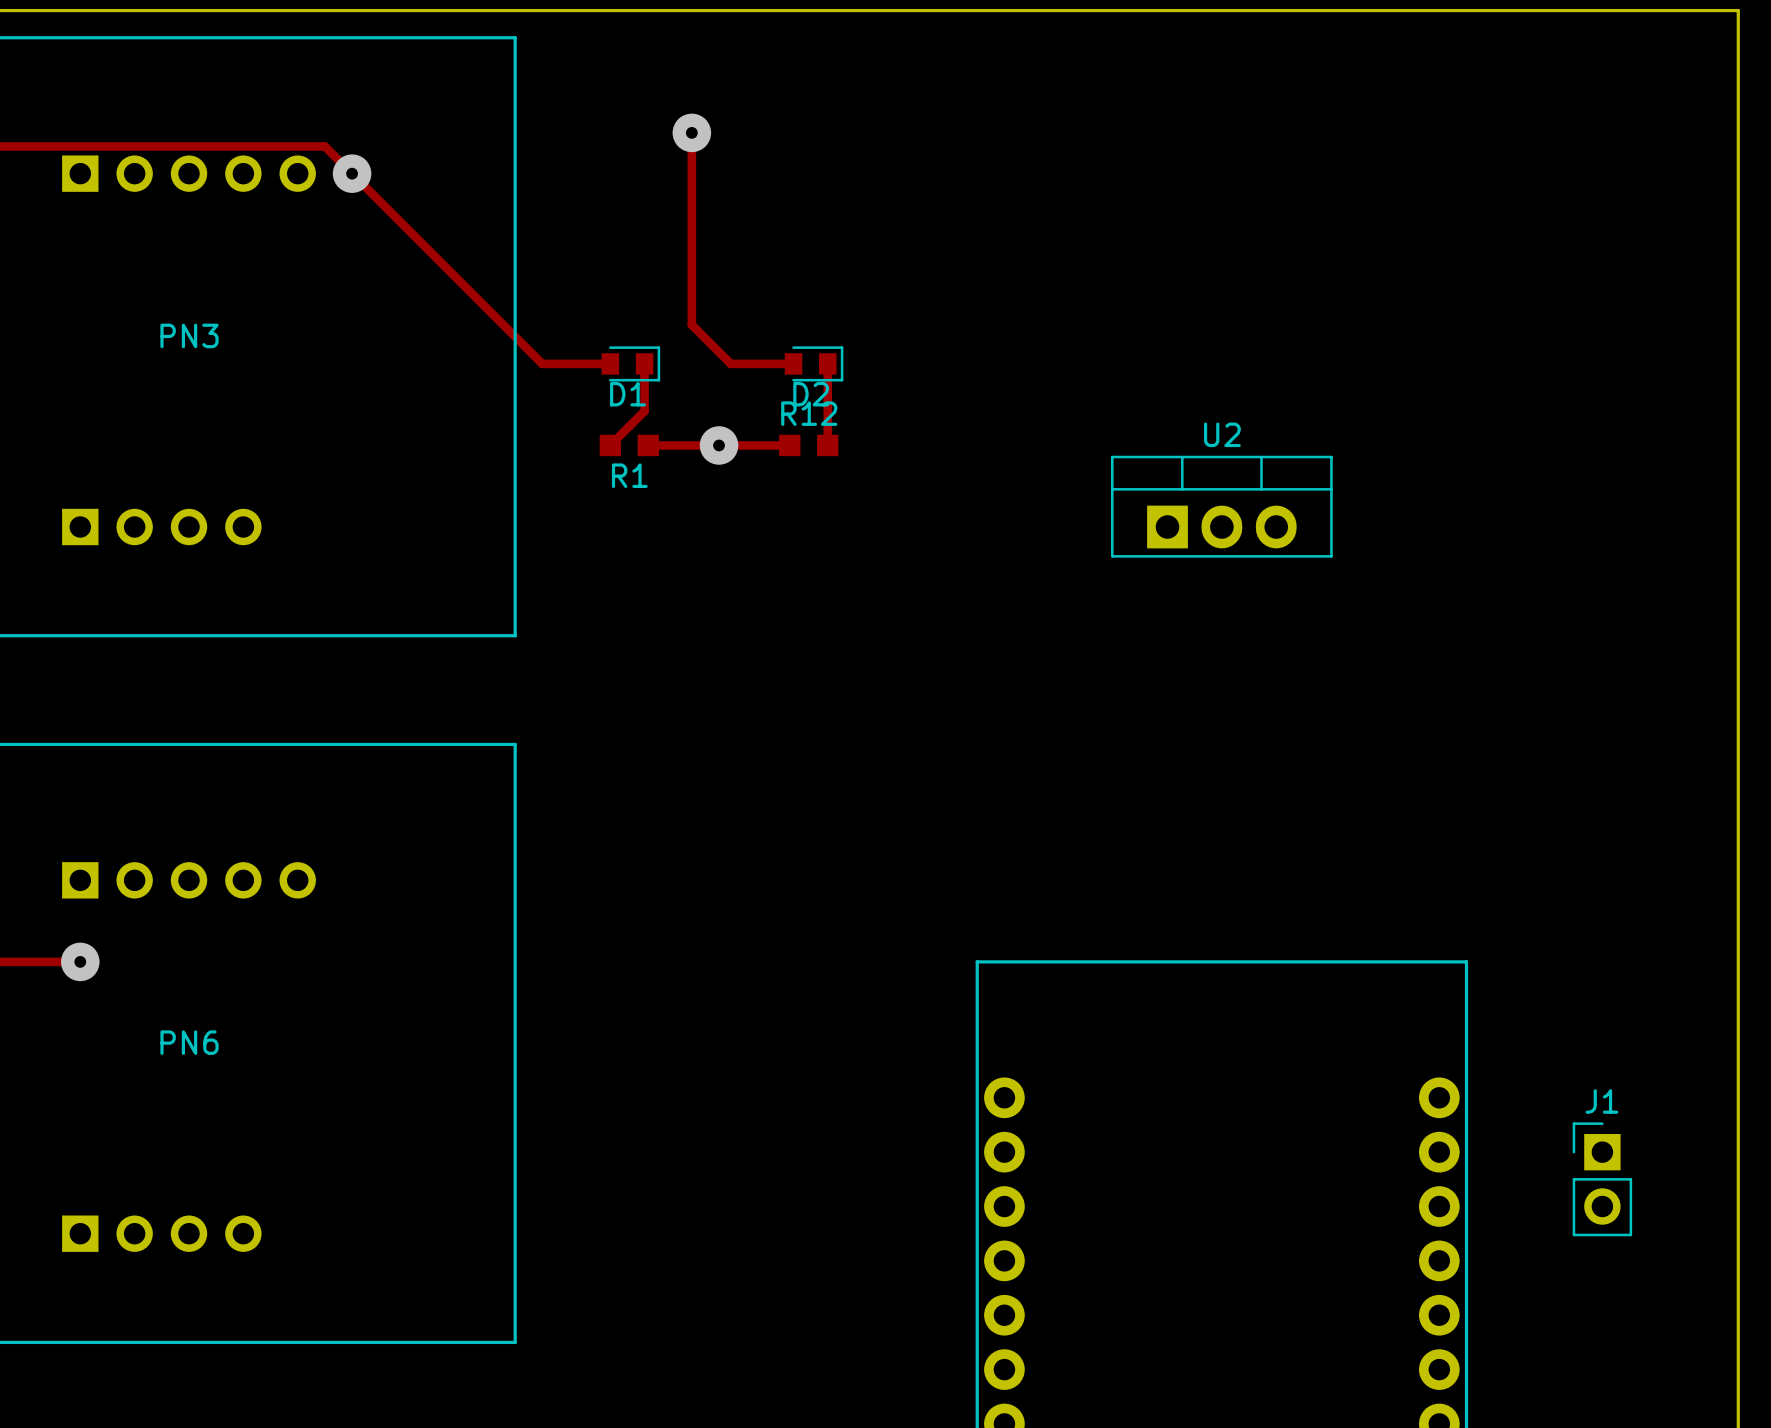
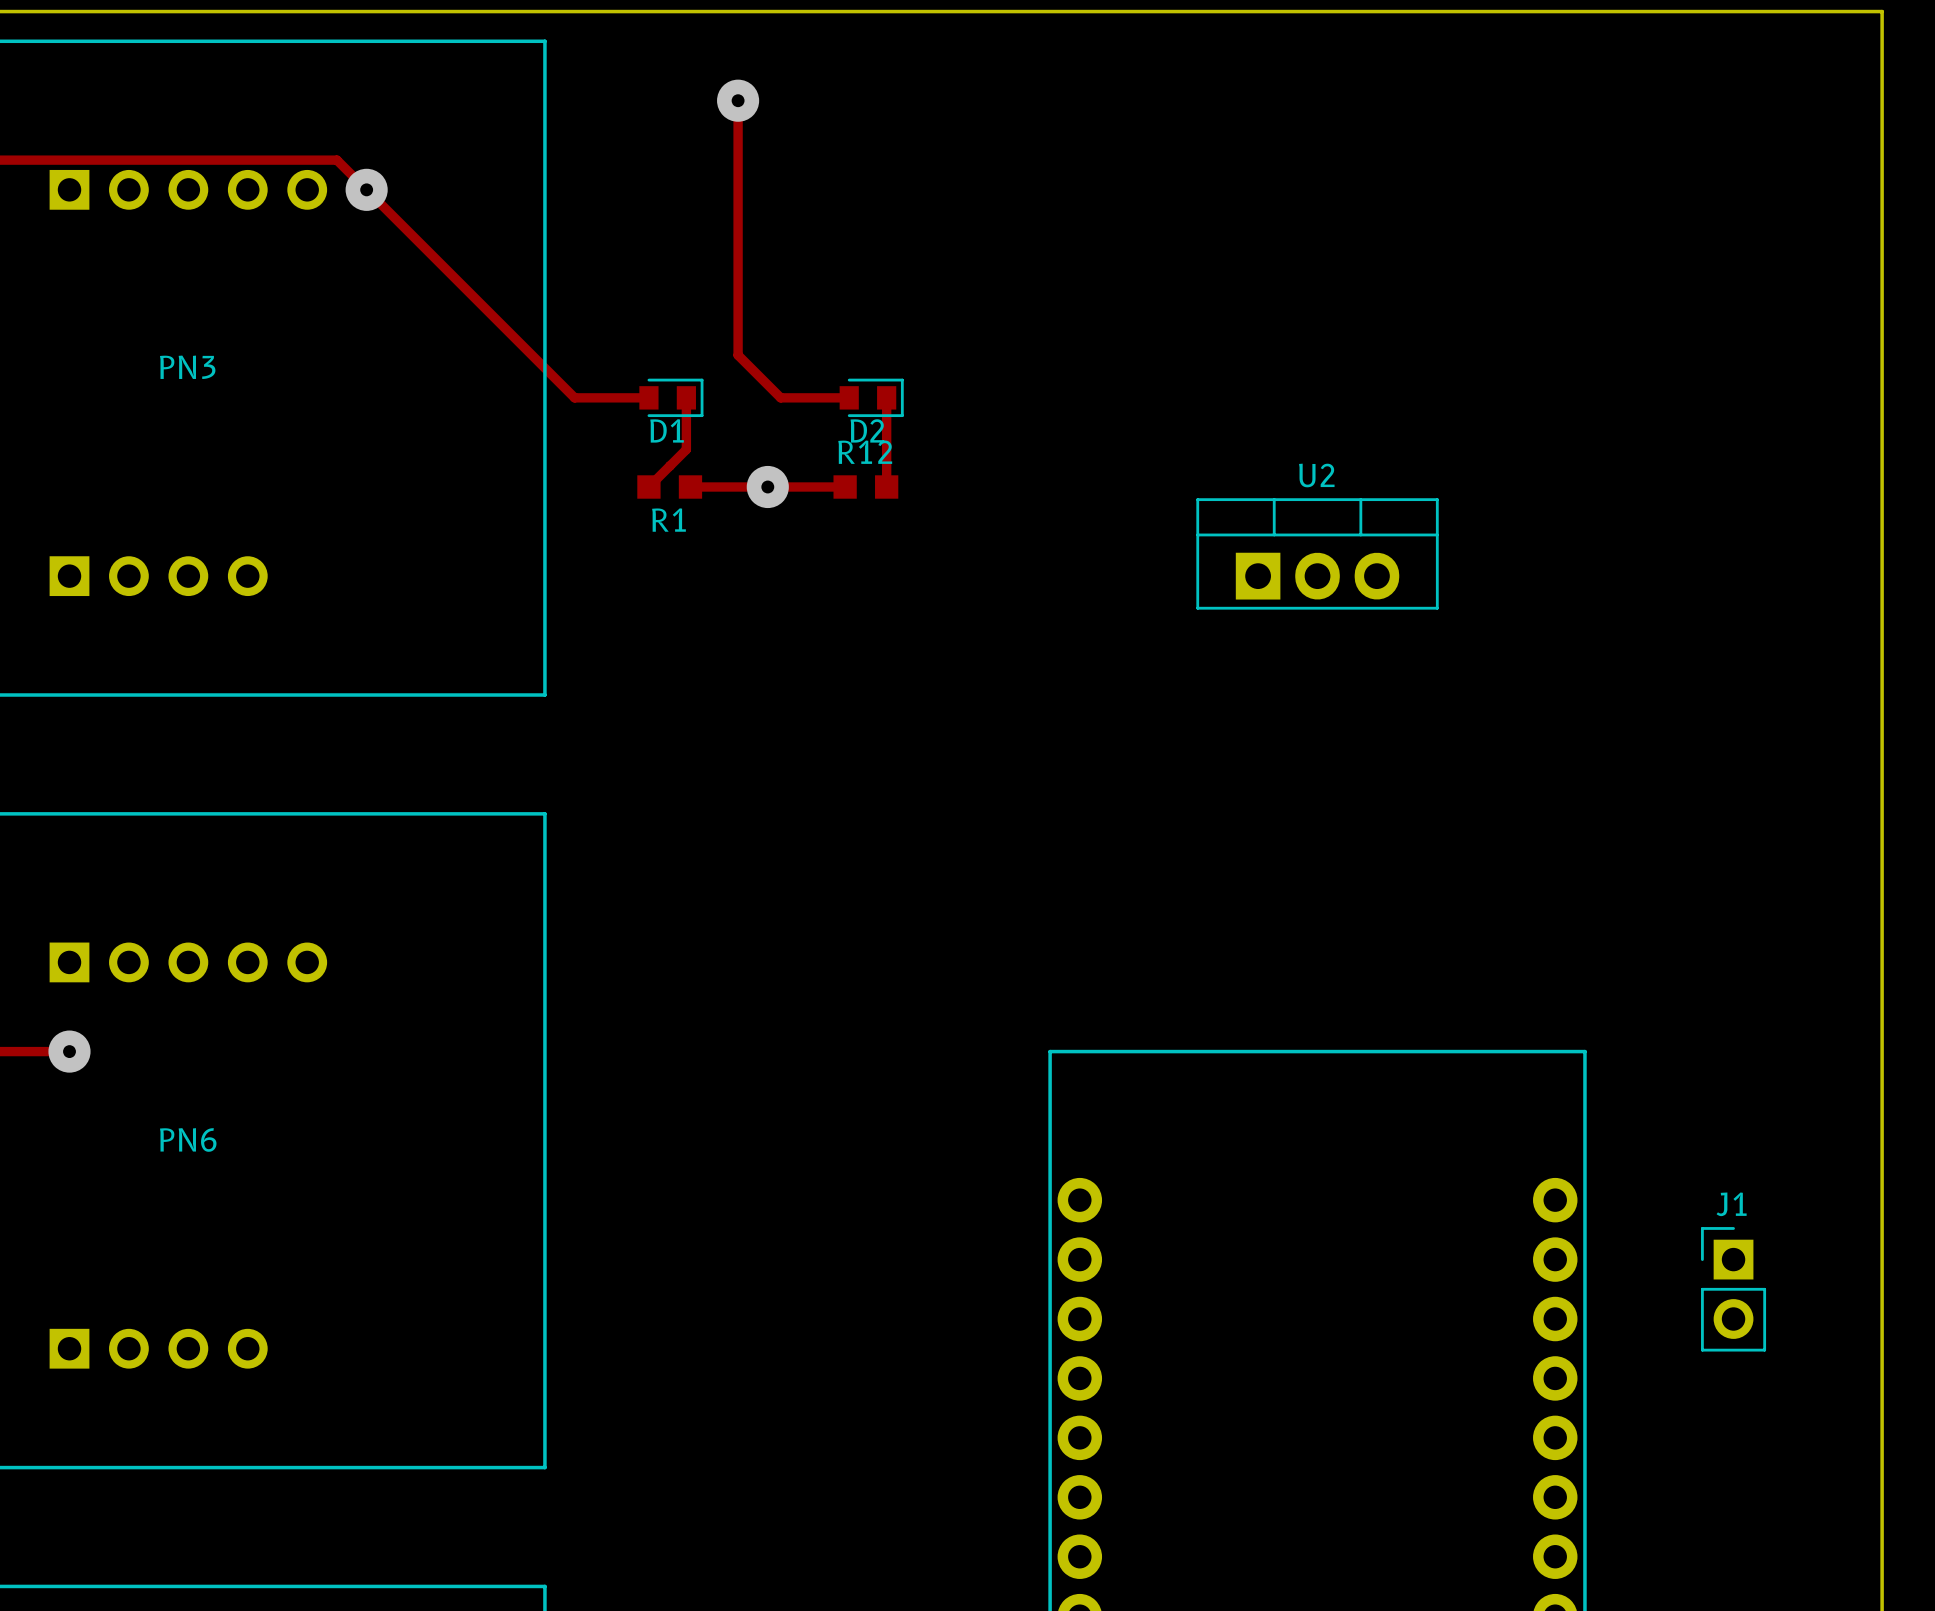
track: none -> (738, 100) (738, 145)
via position: (691, 132) -> (738, 100)

